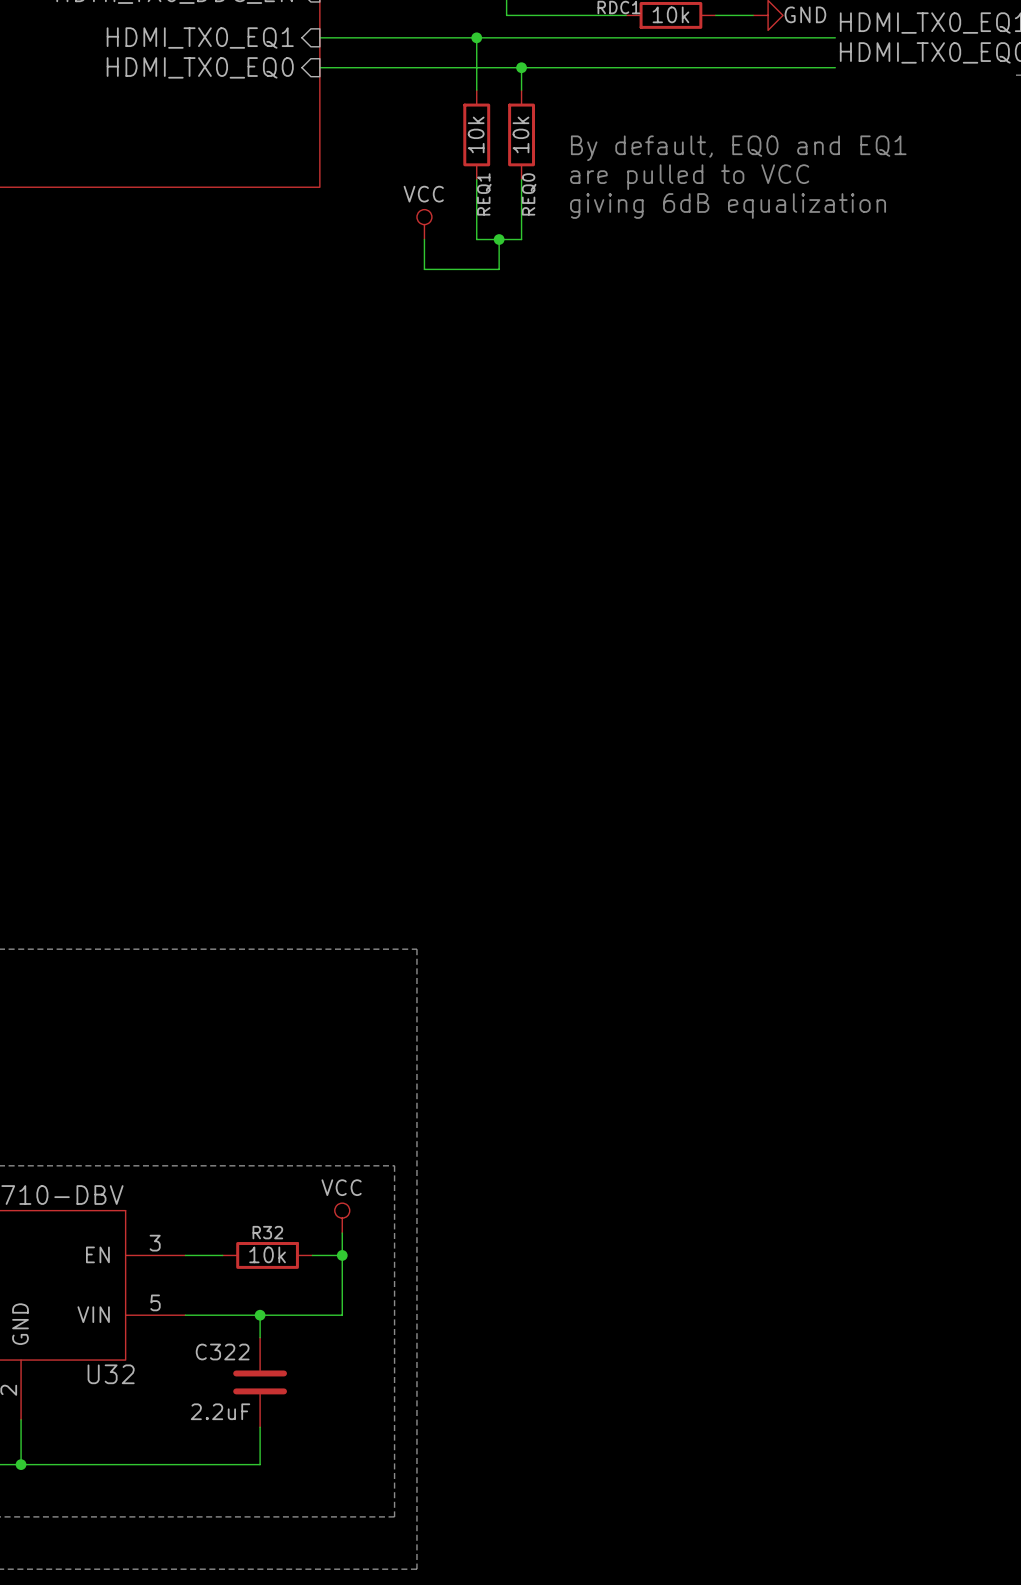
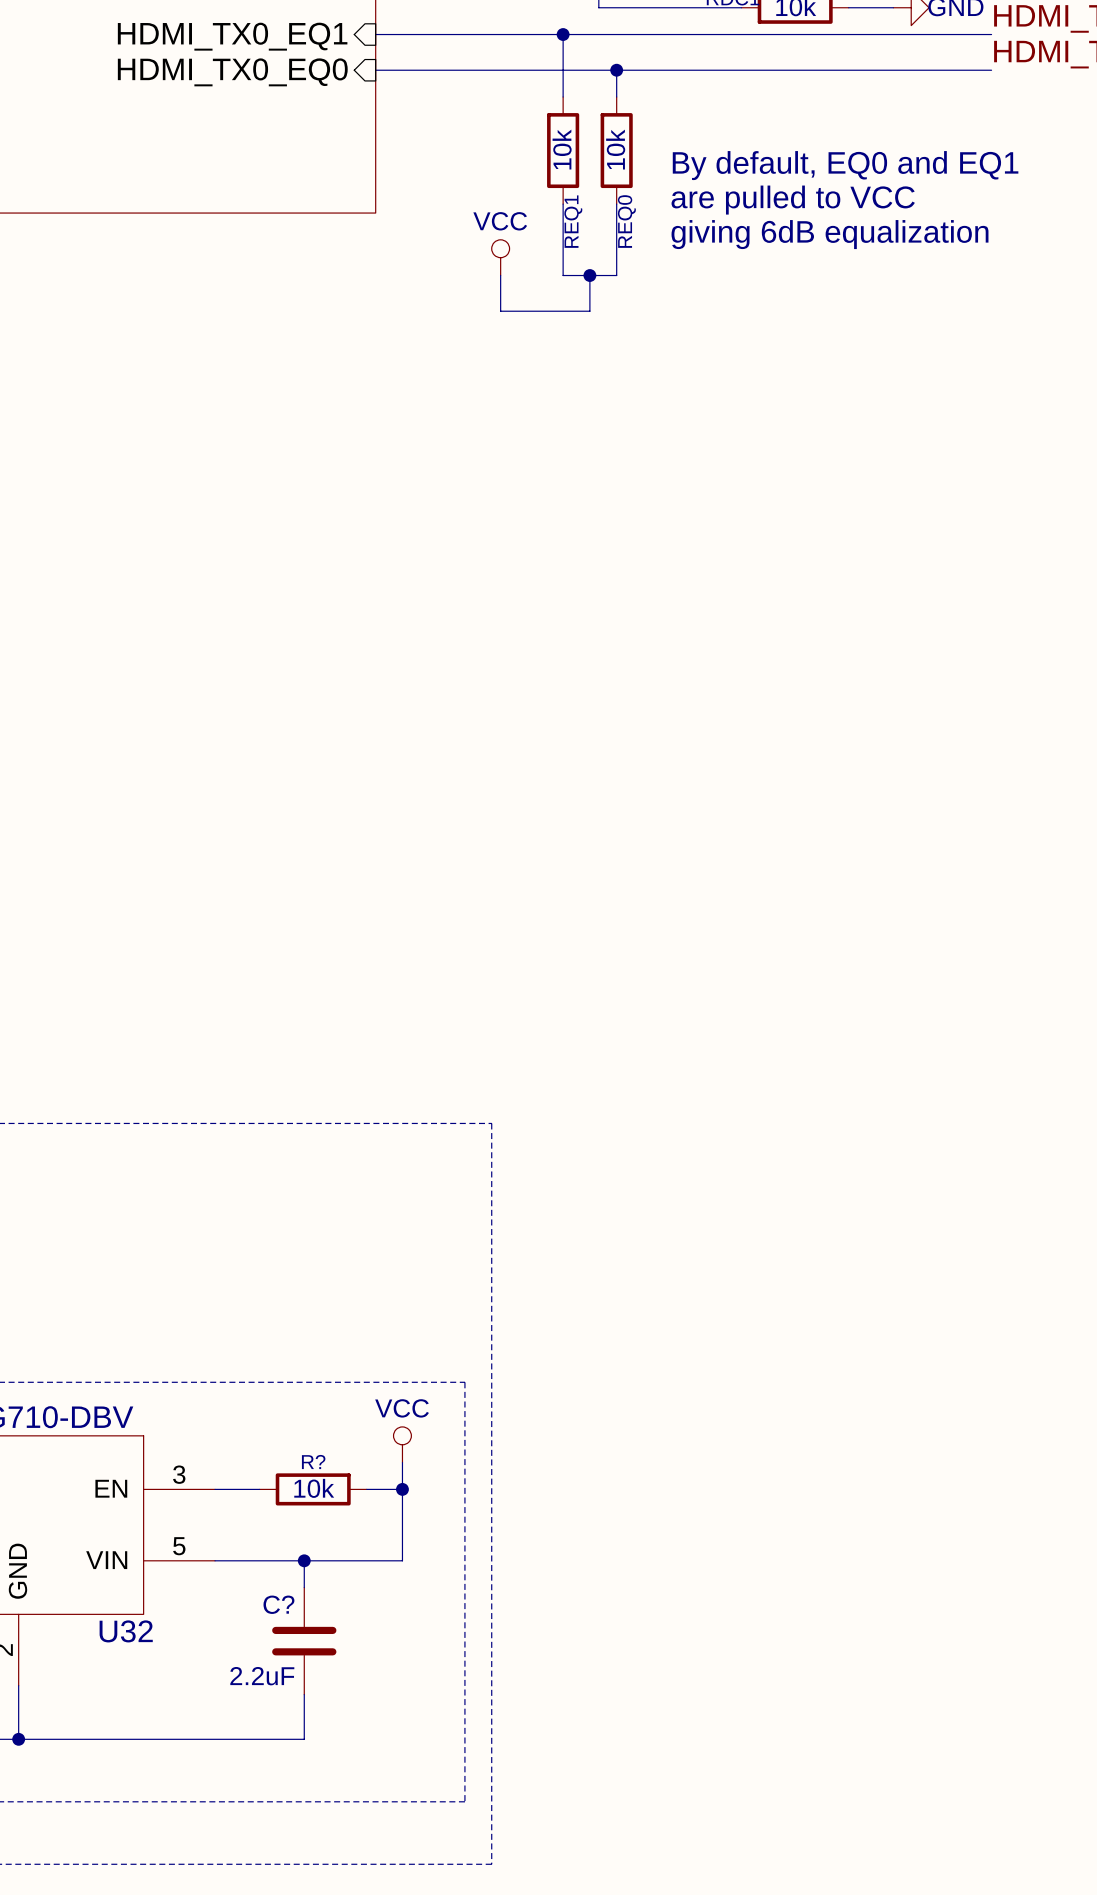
R32 name: R32 (267, 1232) -> R? (313, 1462)
C322 name: C322 (222, 1352) -> C? (278, 1604)

